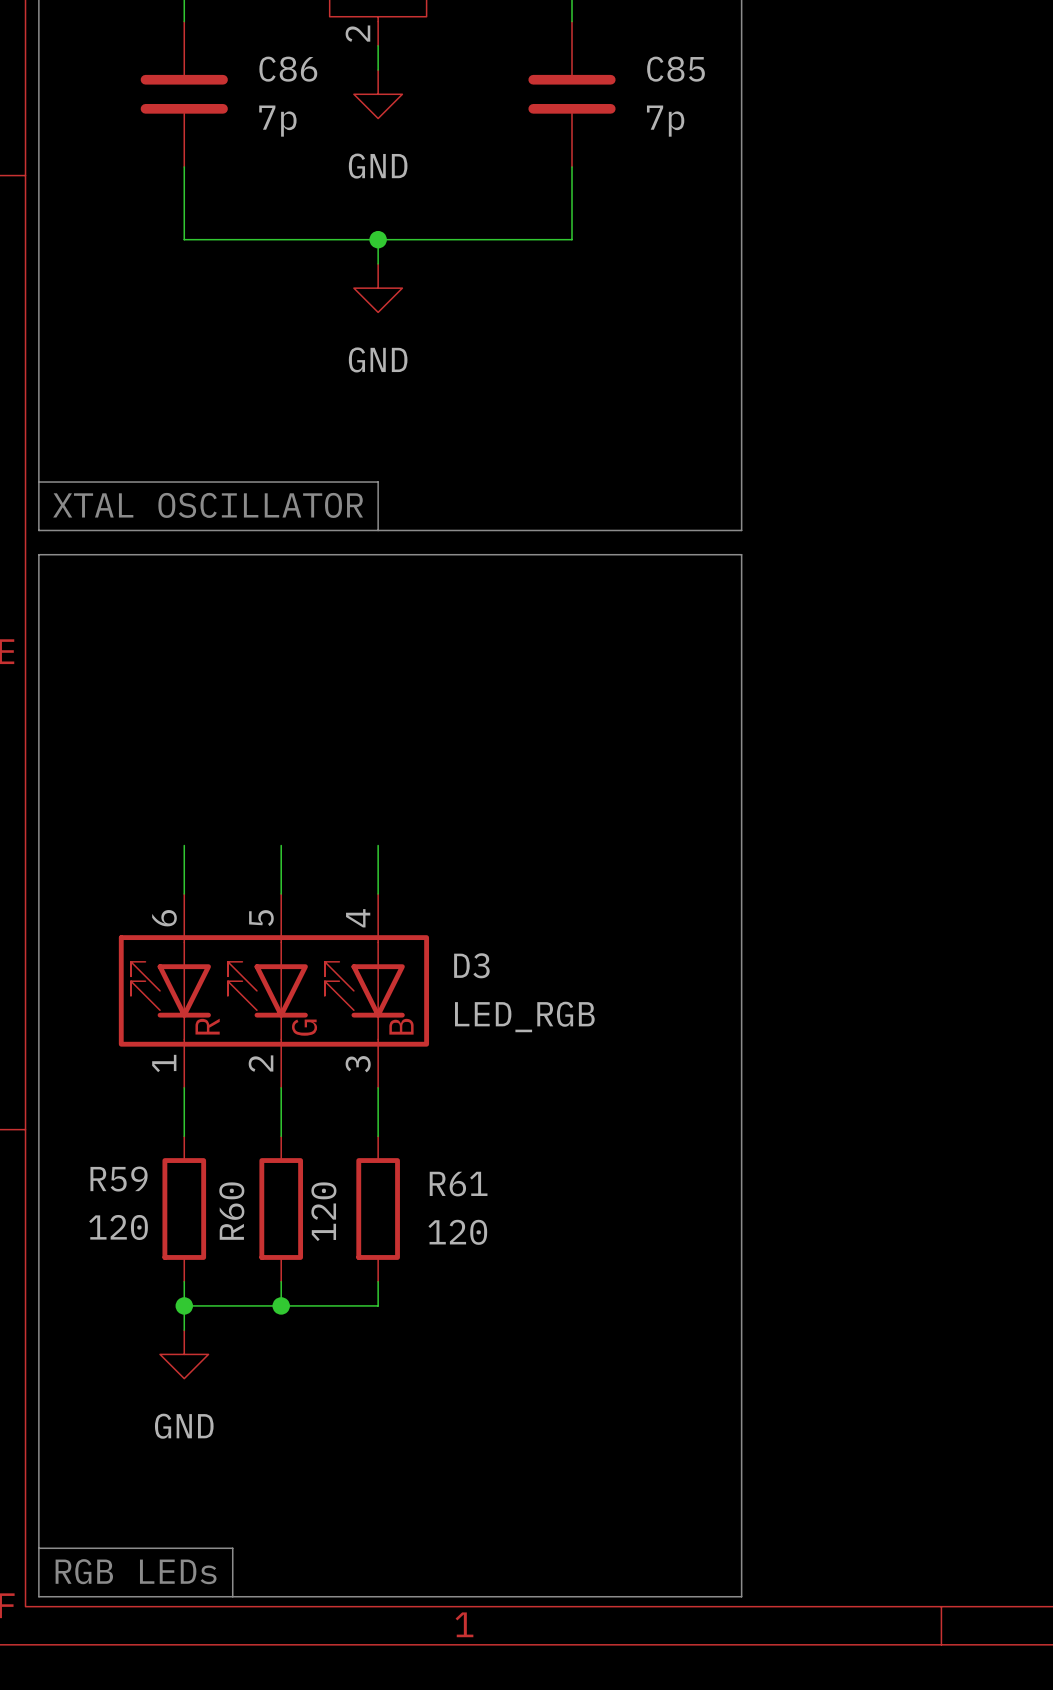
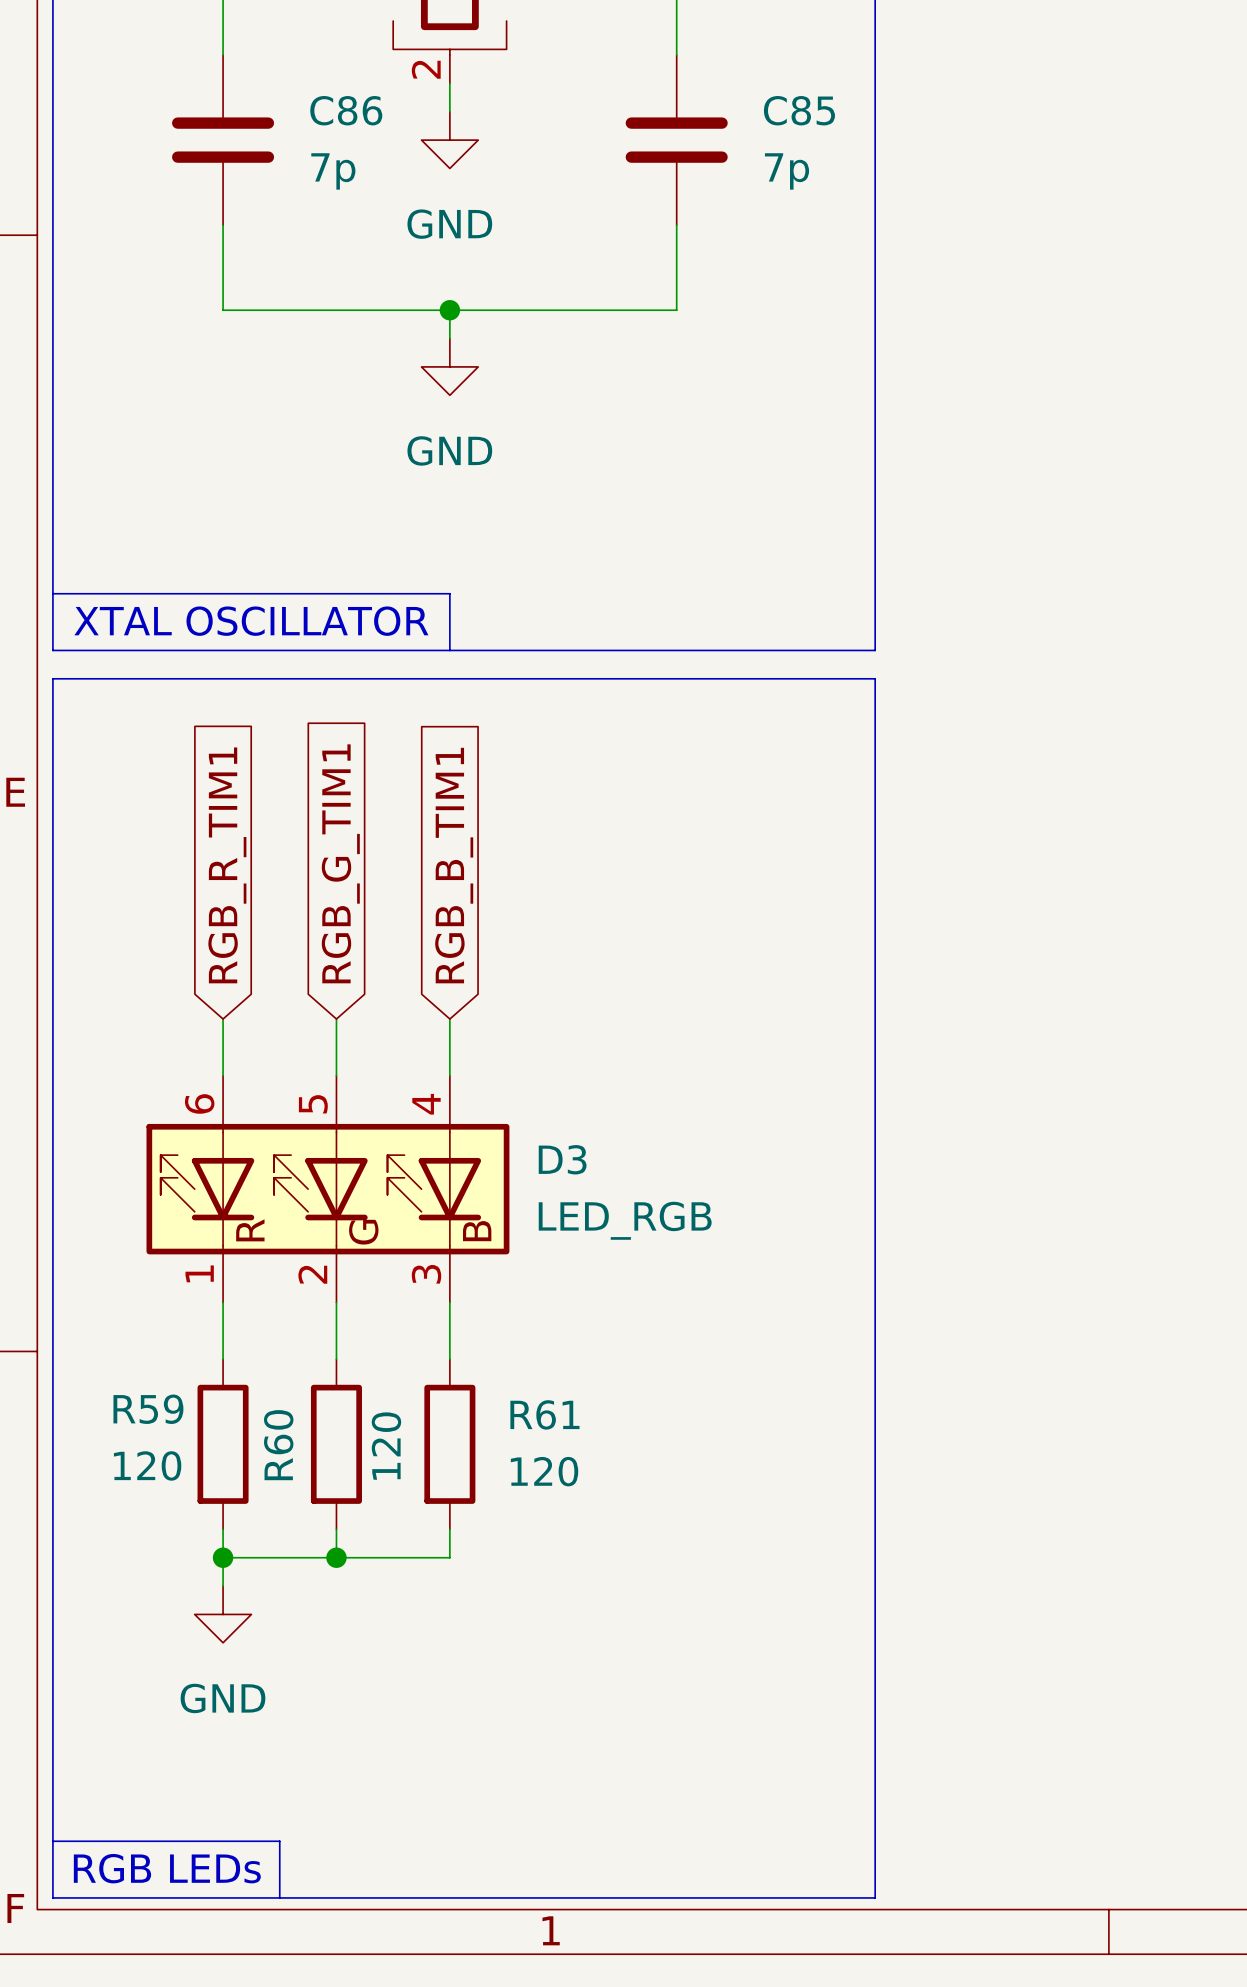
global label: none -> RGB_R_TIM1 (227, 865)
global label: none -> RGB_G_TIM1 (340, 863)
global label: none -> RGB_B_TIM1 (454, 865)

